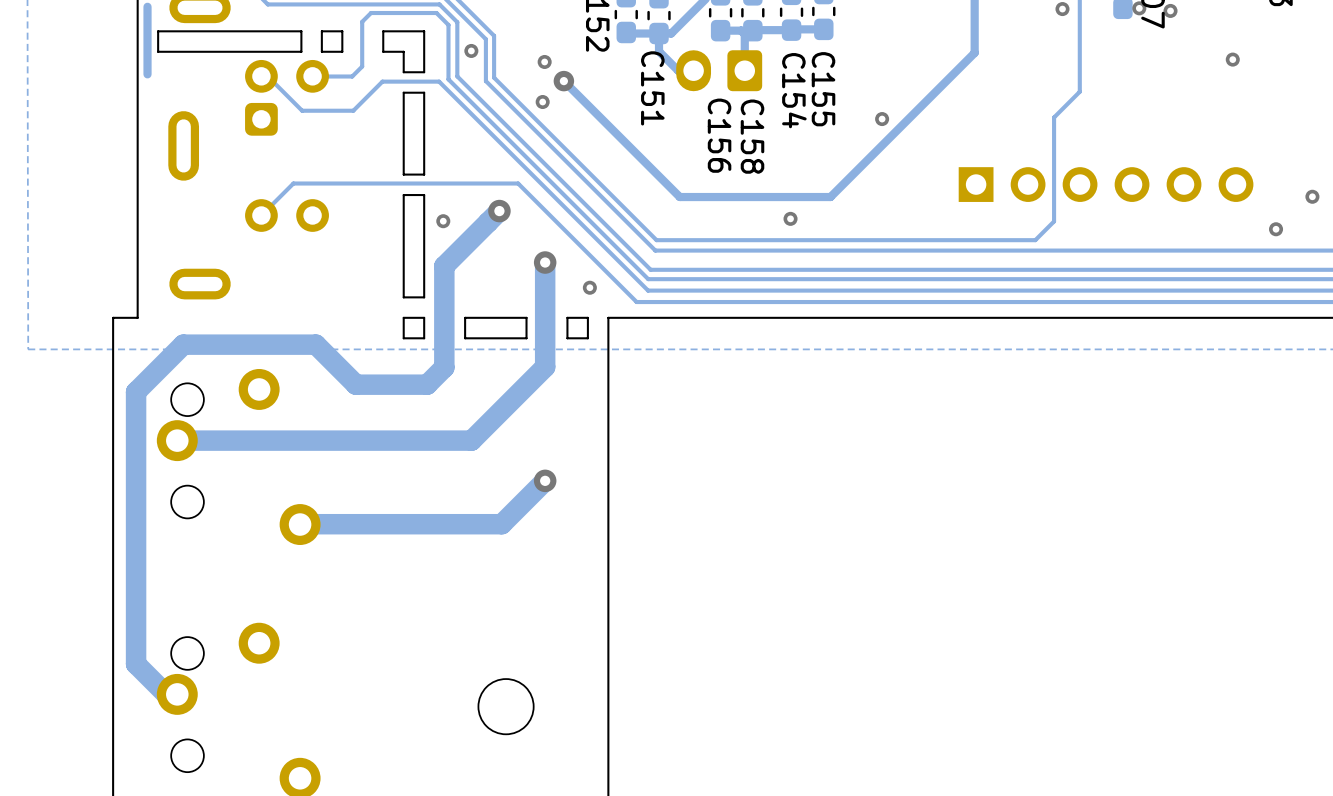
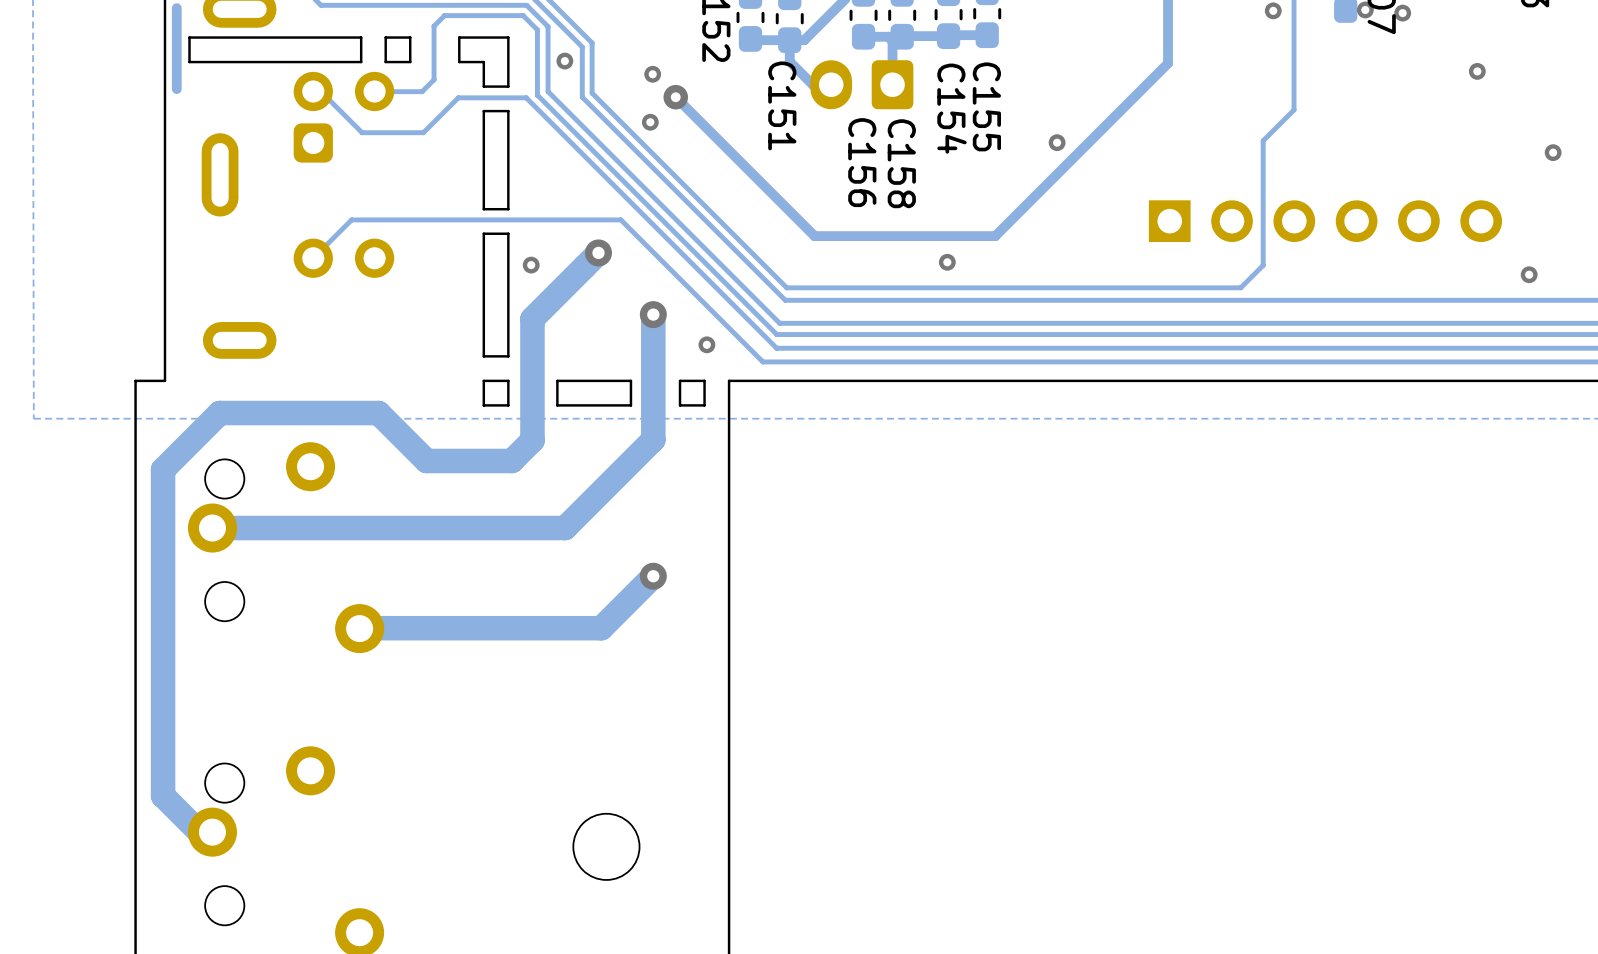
via: none -> (1553, 152)
via: (1312, 196) -> none

